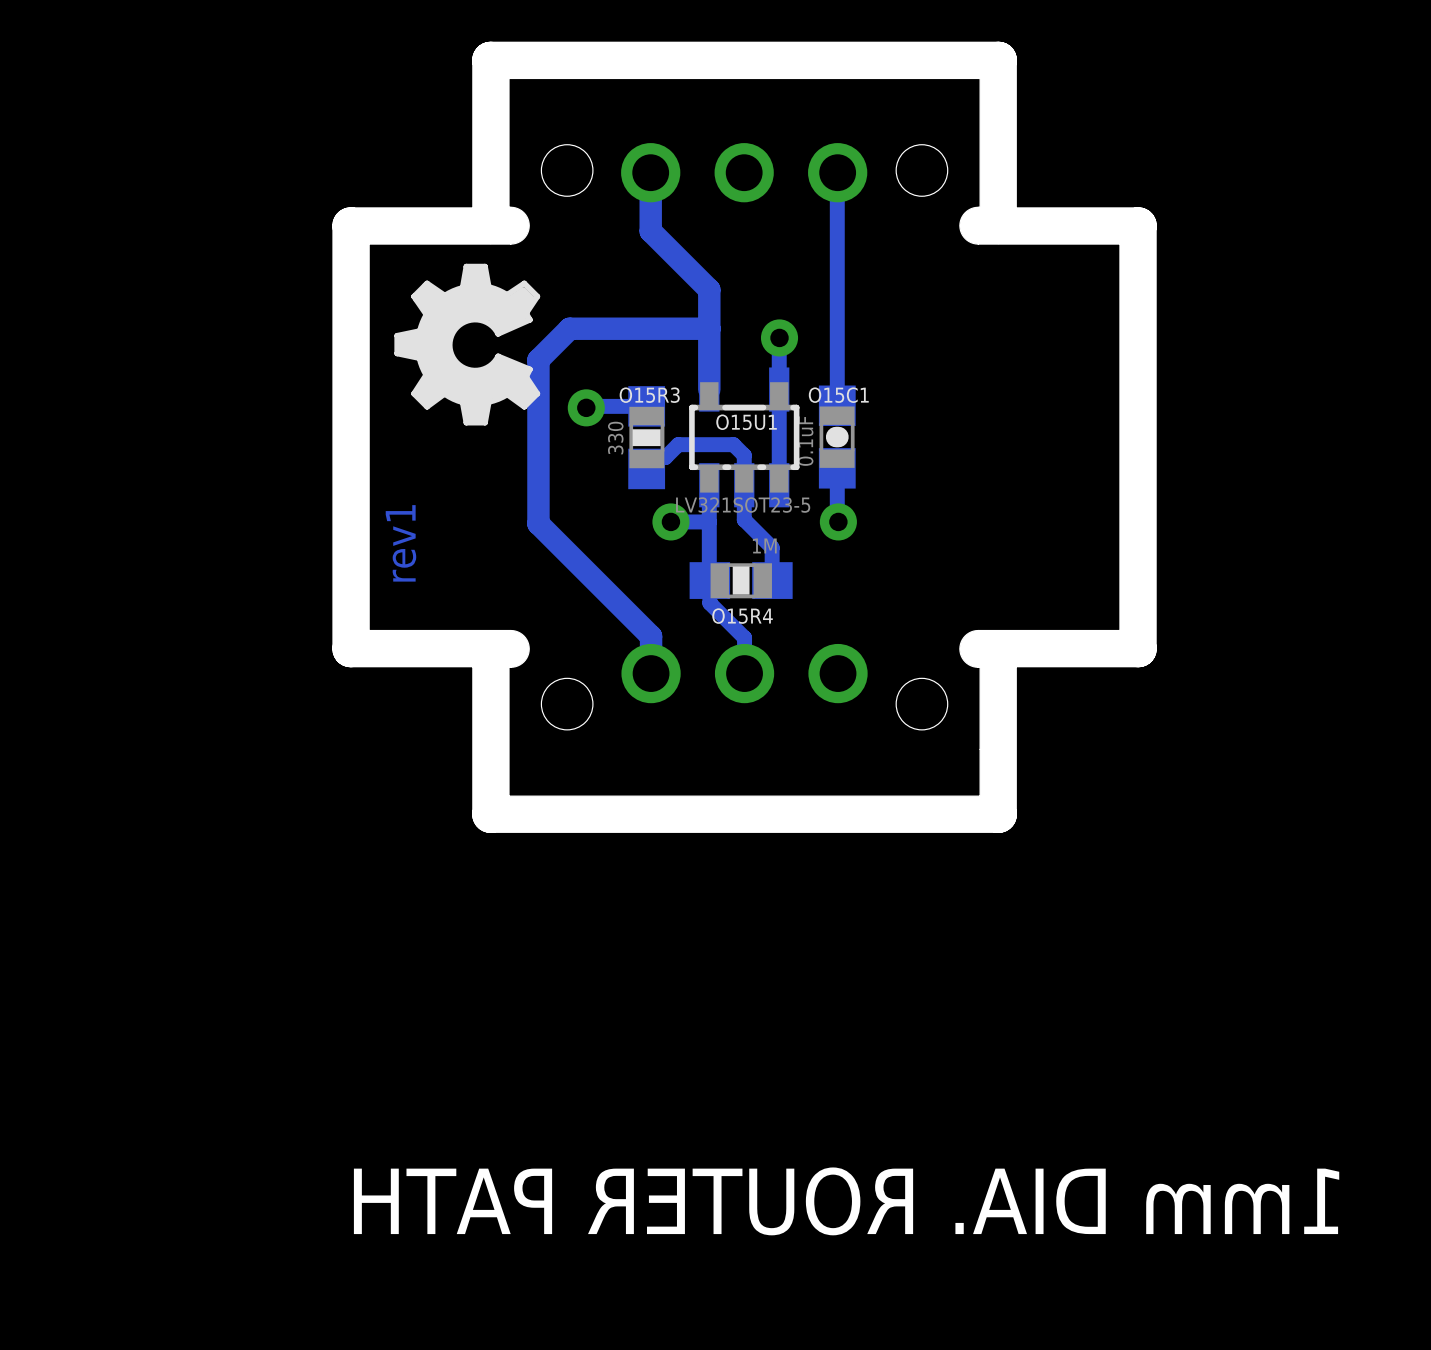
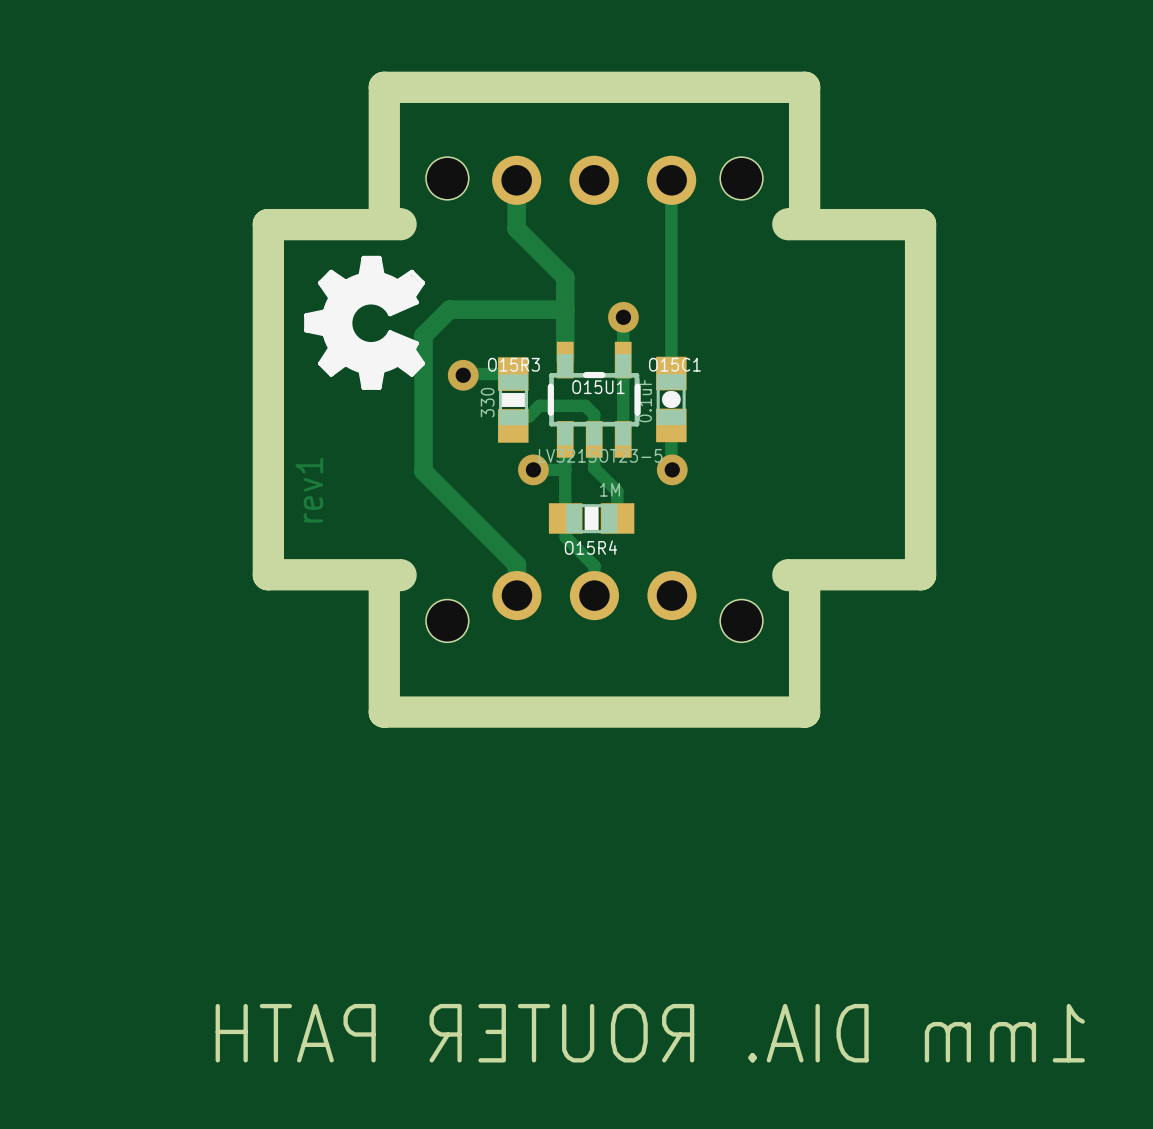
O15U1 footprint: [689, 367, 800, 508] -> [547, 341, 641, 458]

